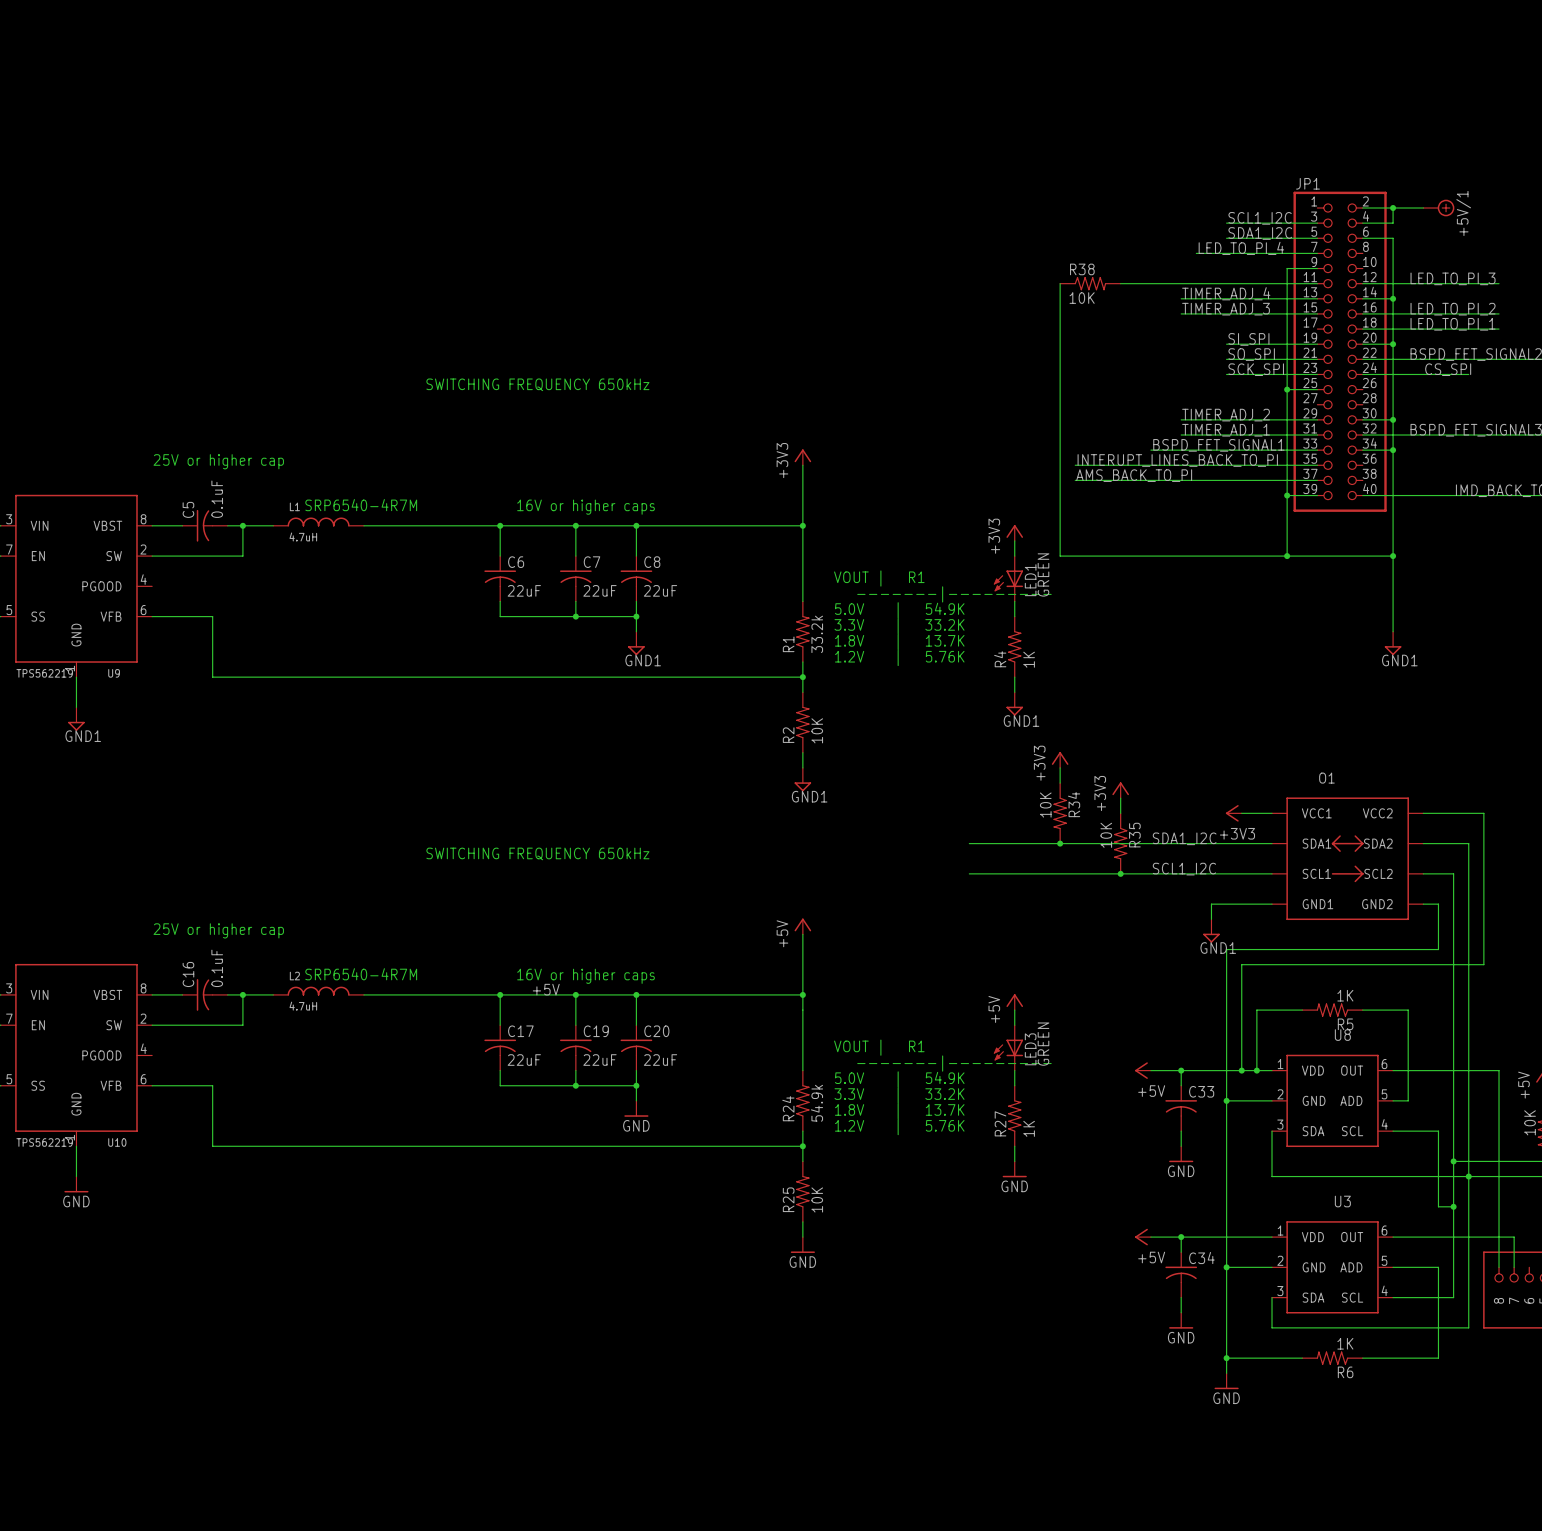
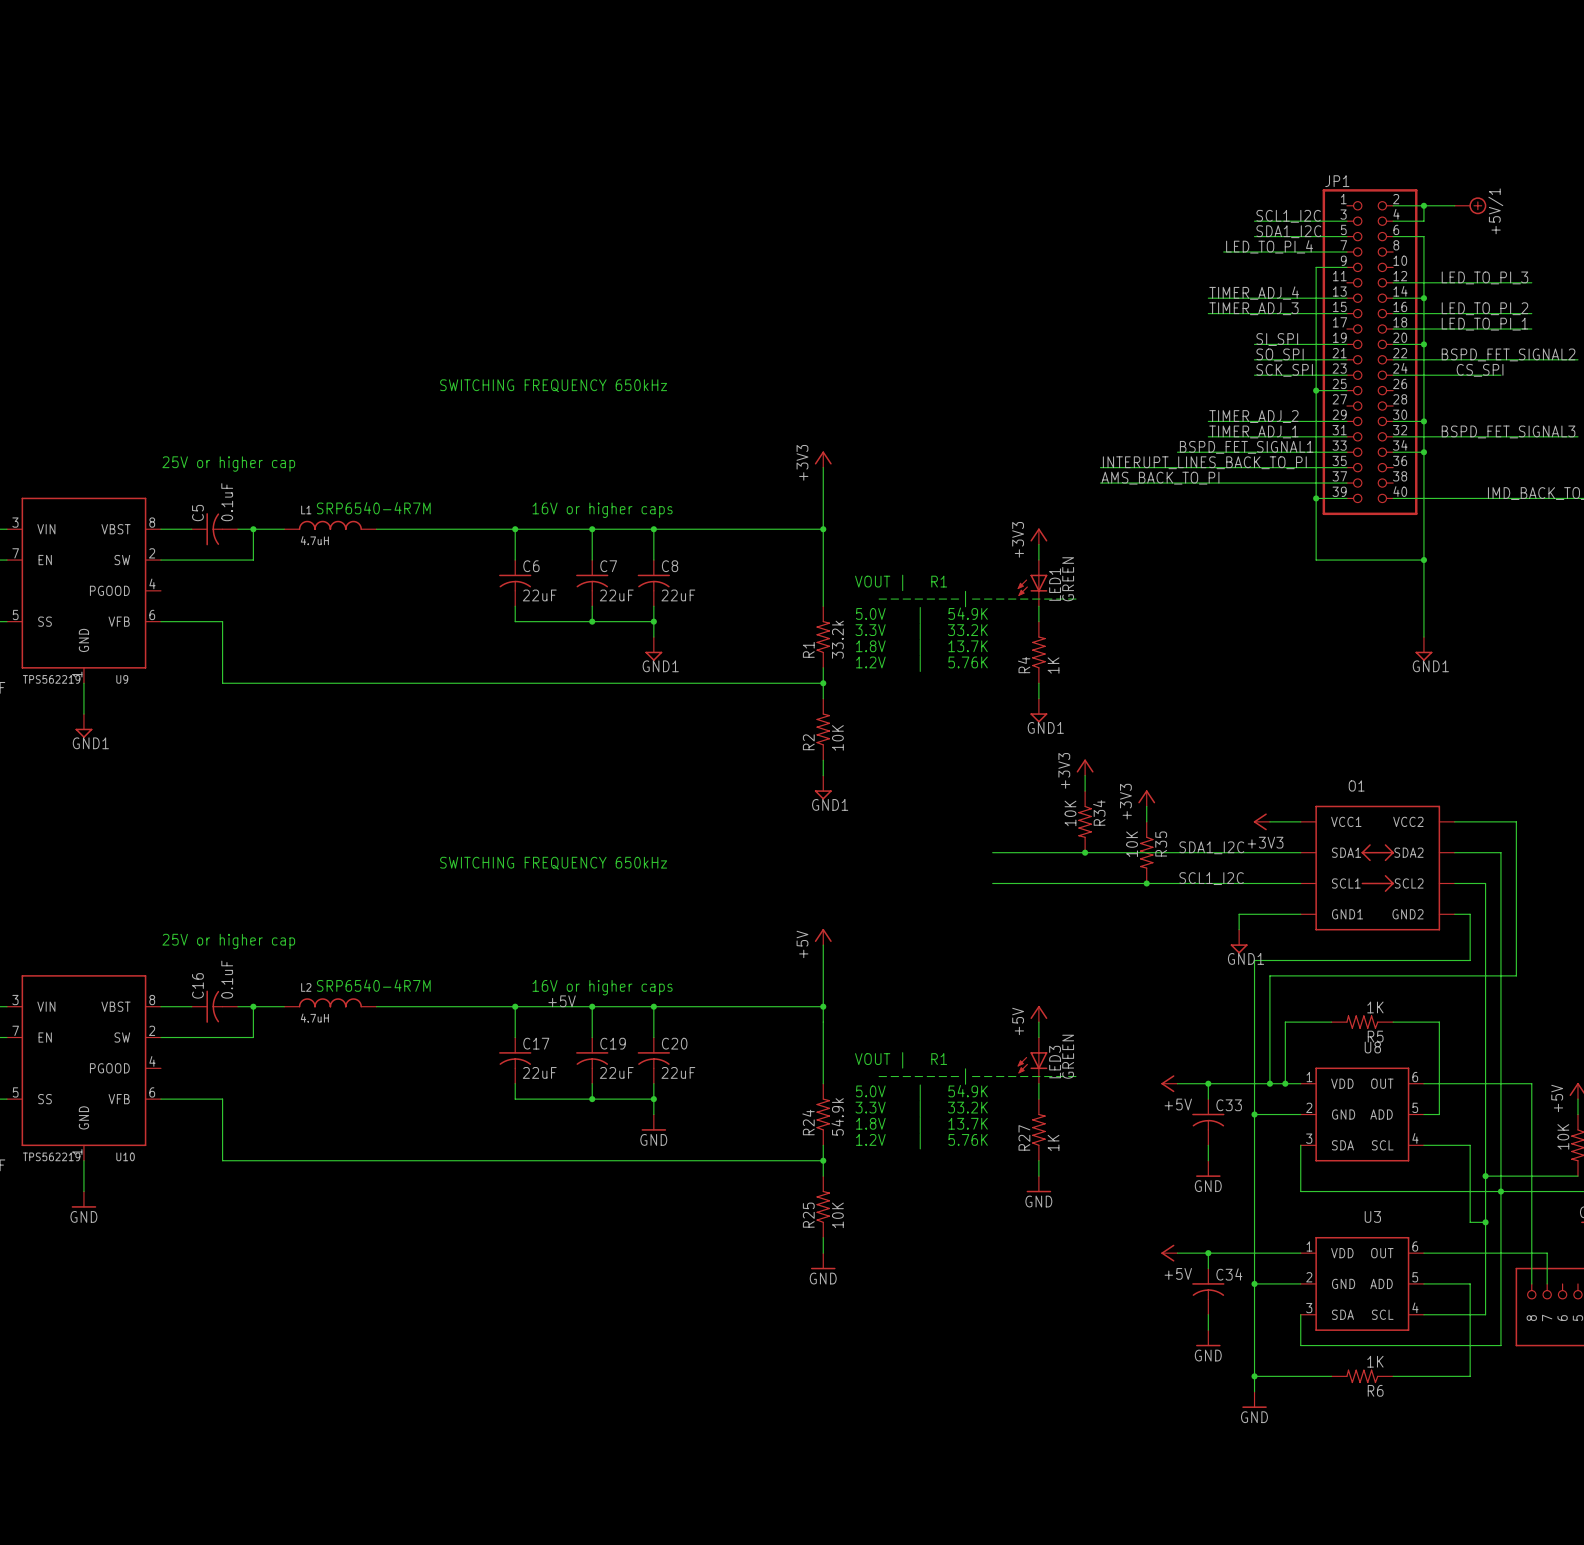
wire: (1060, 283) (1060, 556) (1287, 556) -> none
R38: 10K (1090, 283) -> none
wire: (1120, 283) (1317, 283) -> none
junction: (1287, 556) -> none

